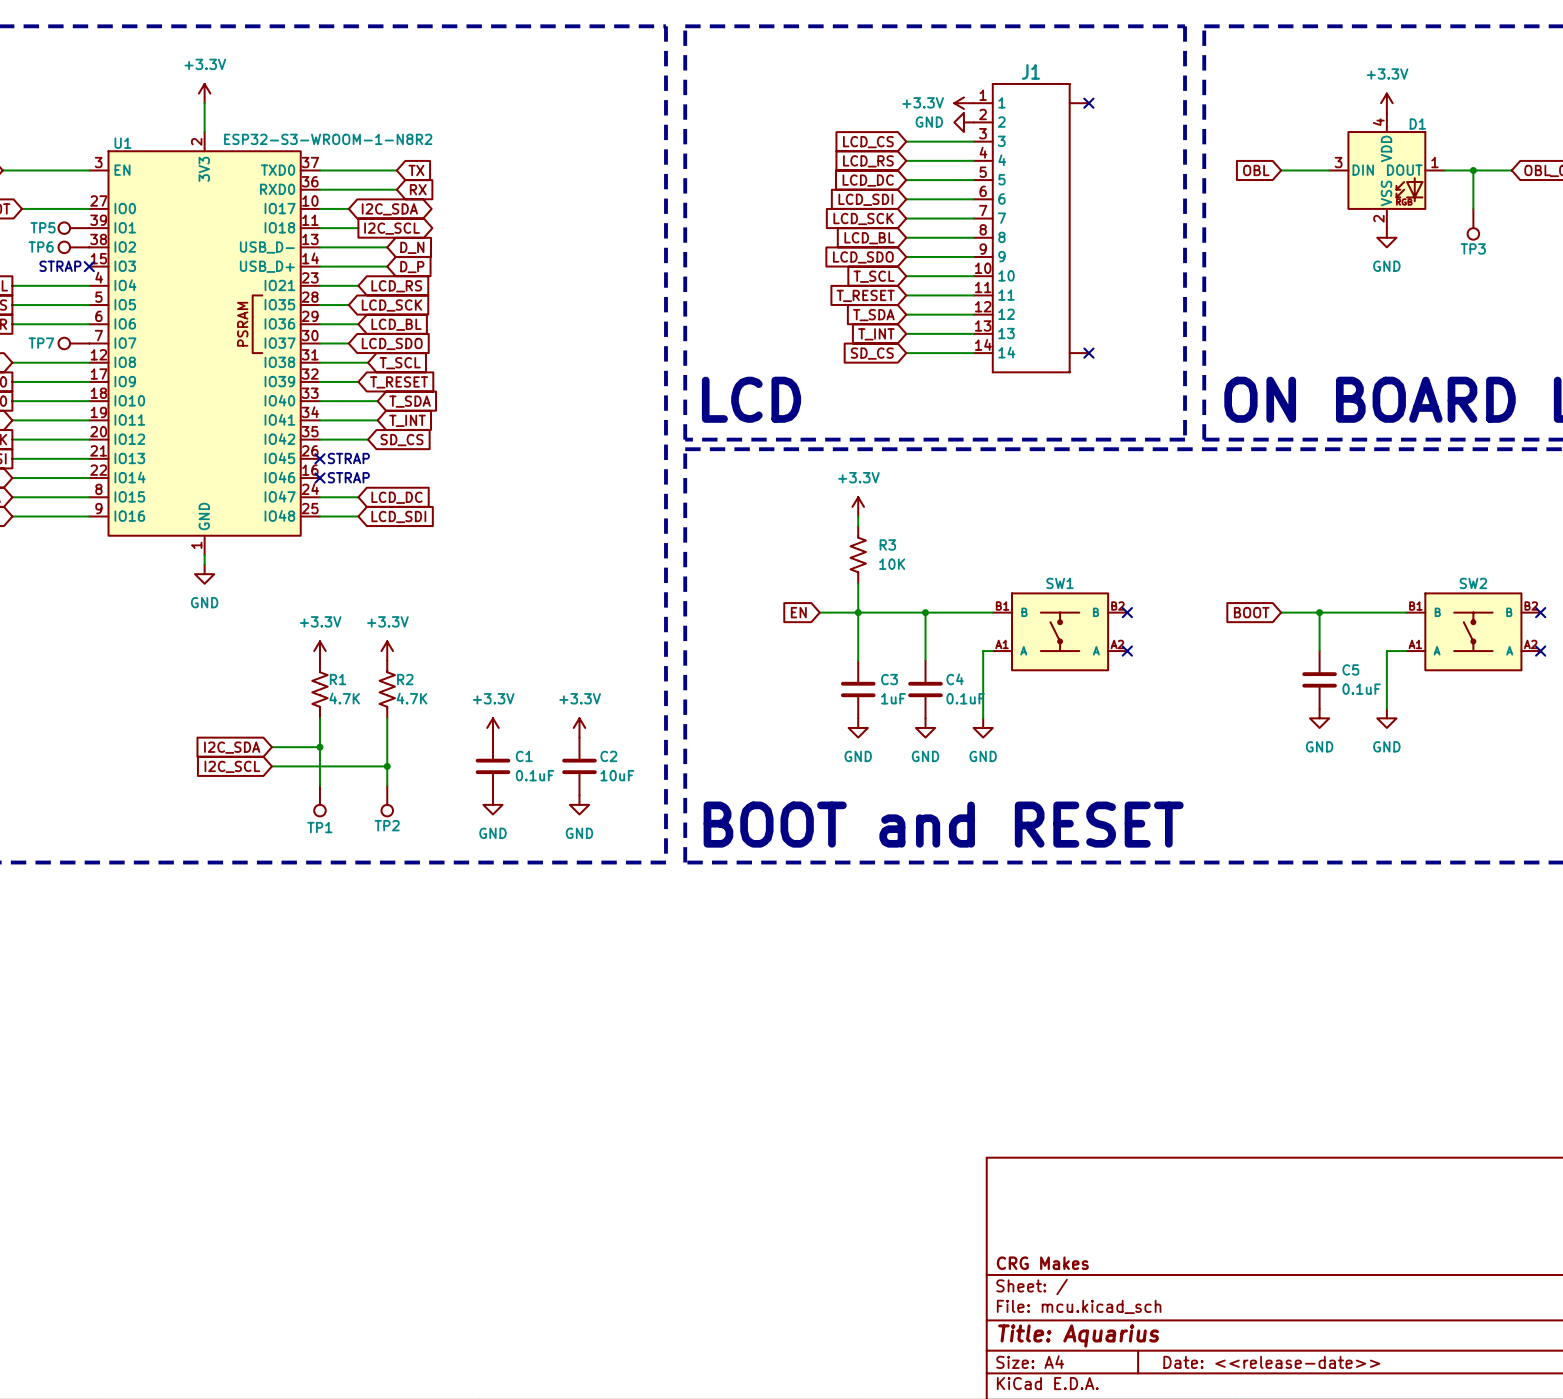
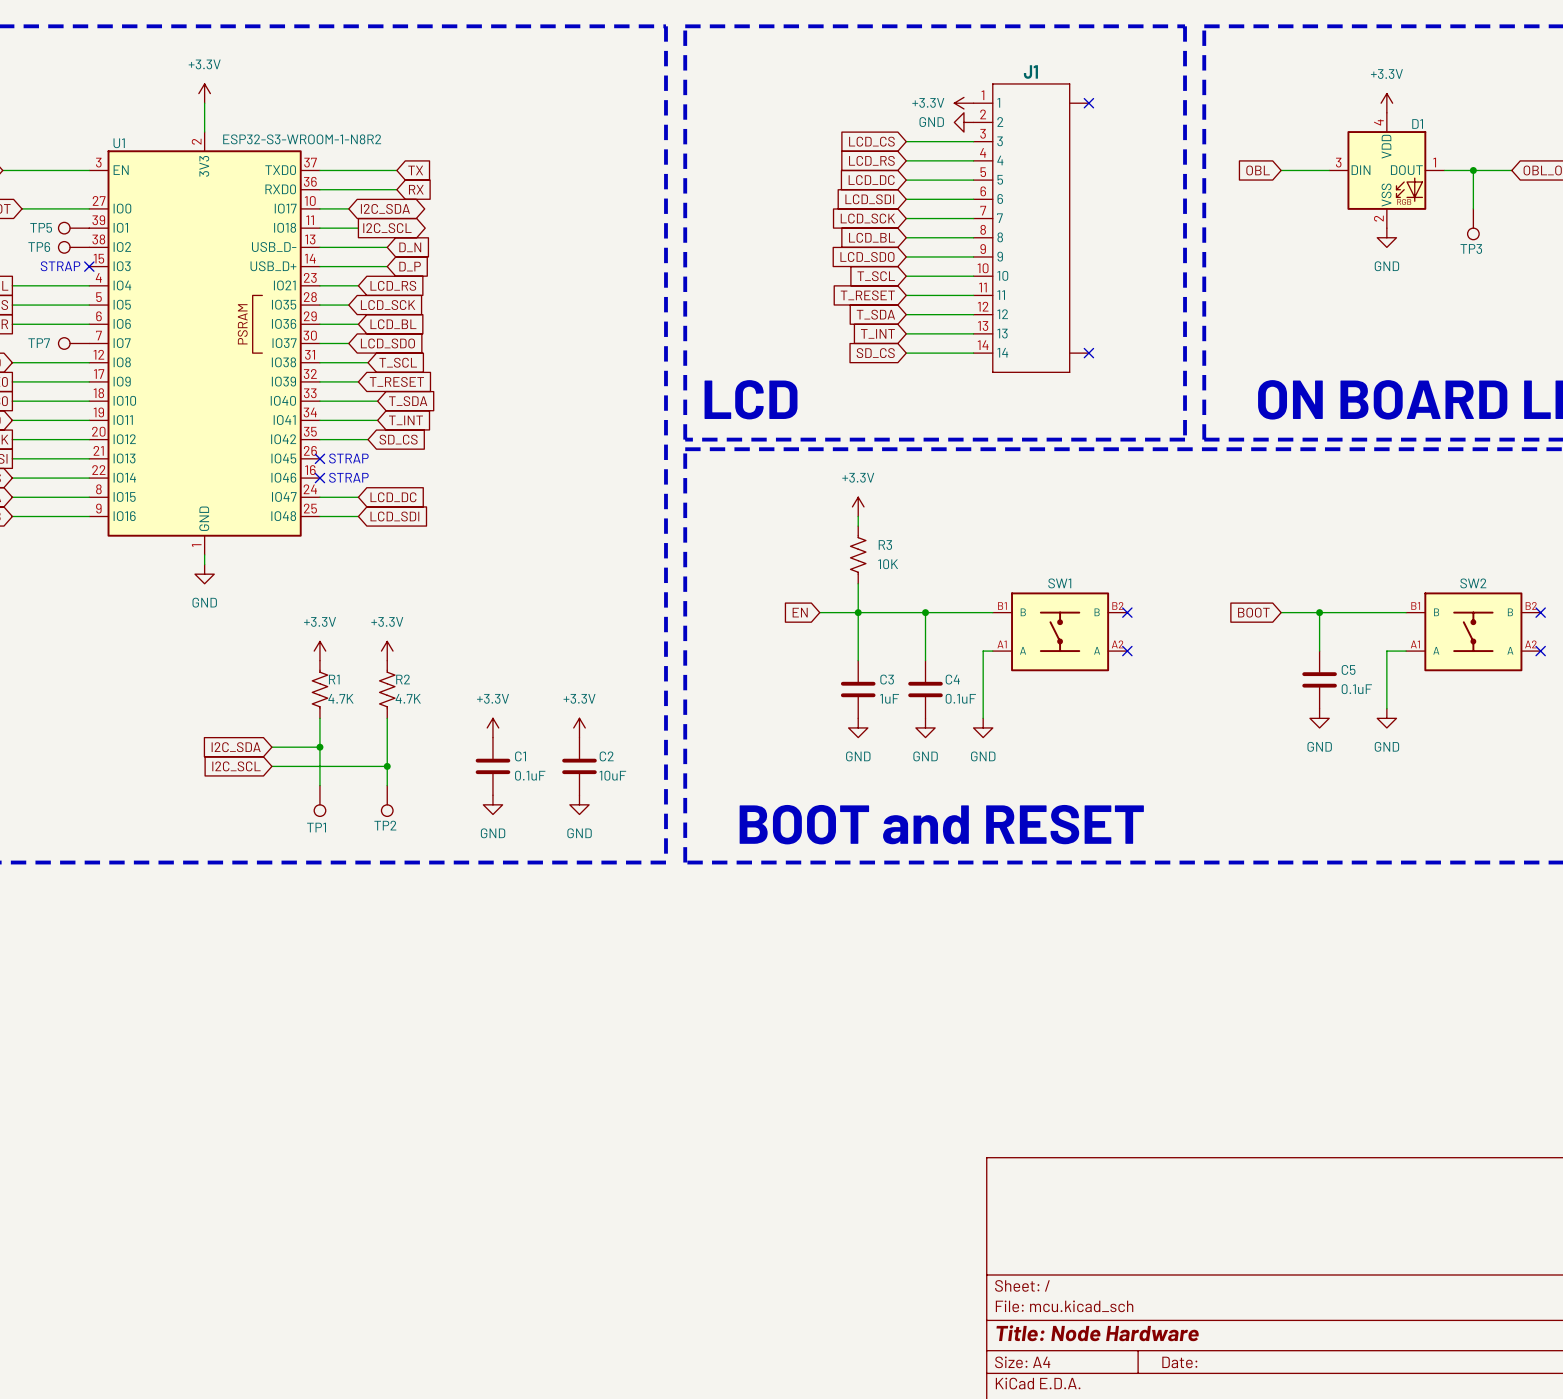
title block: CRG Makes (1042, 1263) -> none
title block: Title: Aquarius (1078, 1335) -> Title: Node Hardware (1097, 1333)
title block: Date: <<release-date>> (1271, 1362) -> Date: (1179, 1362)

